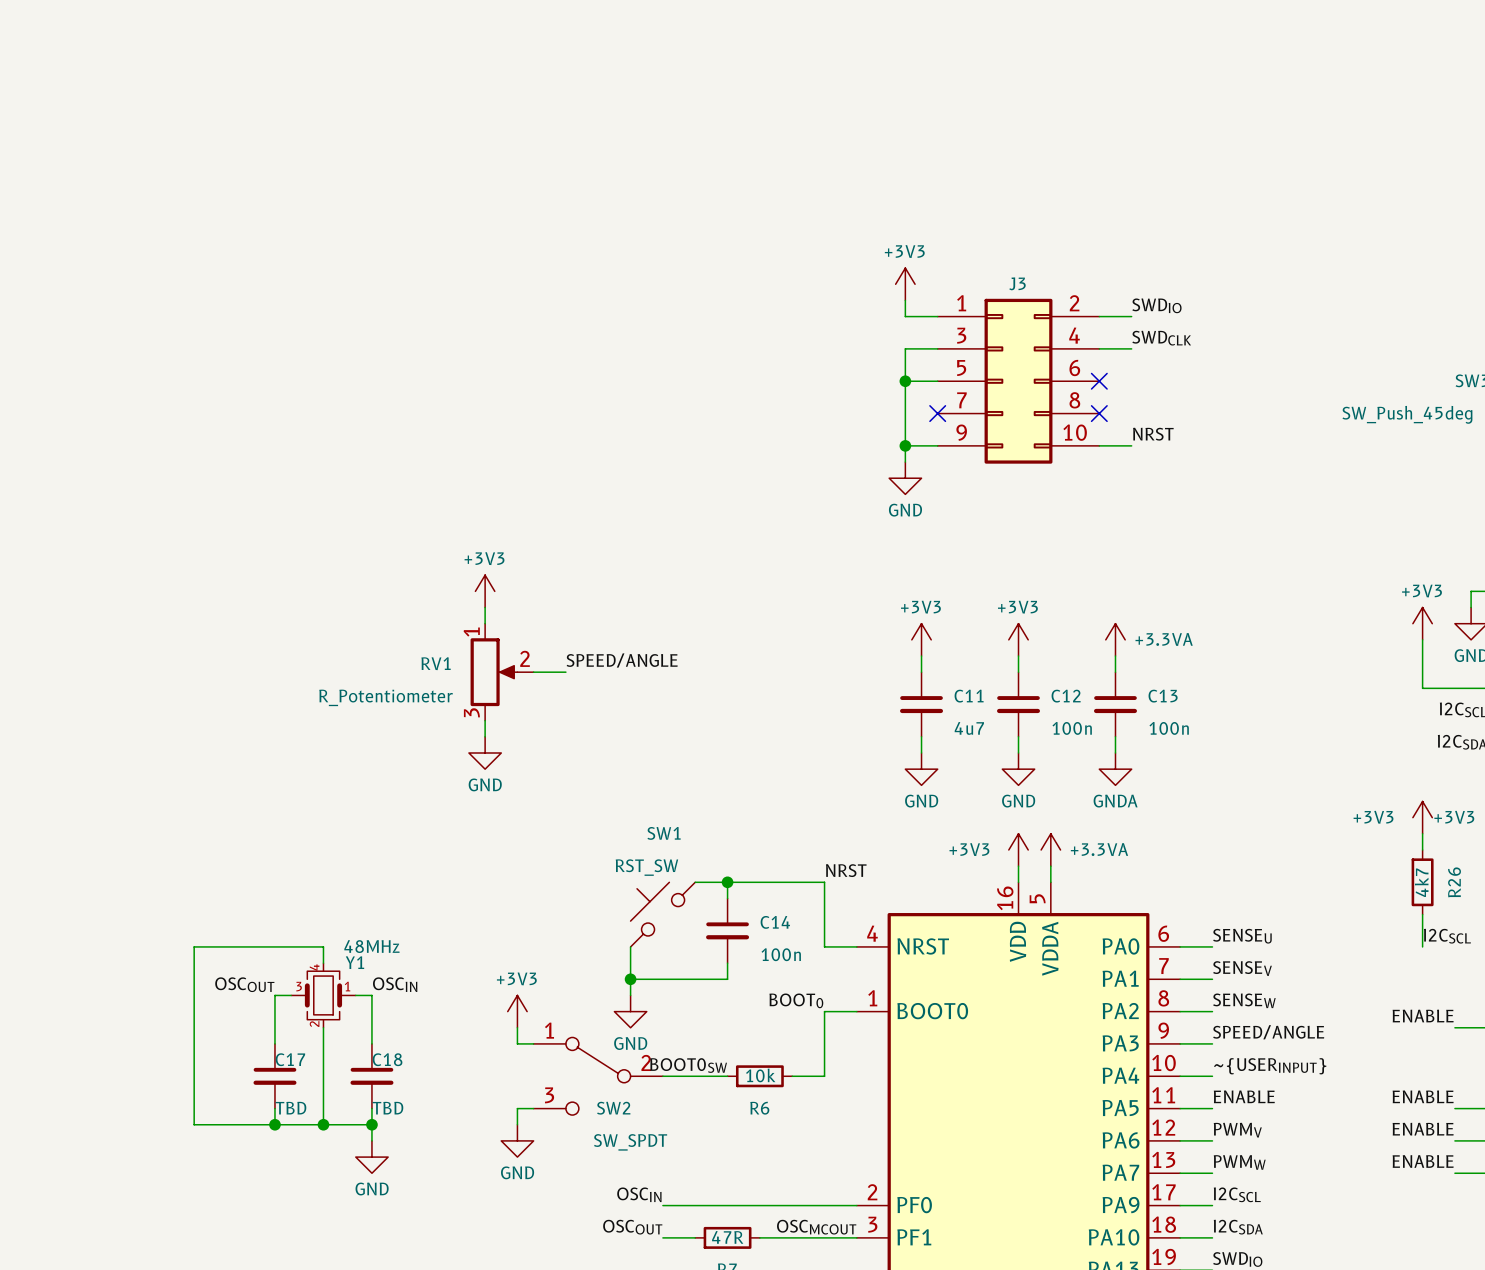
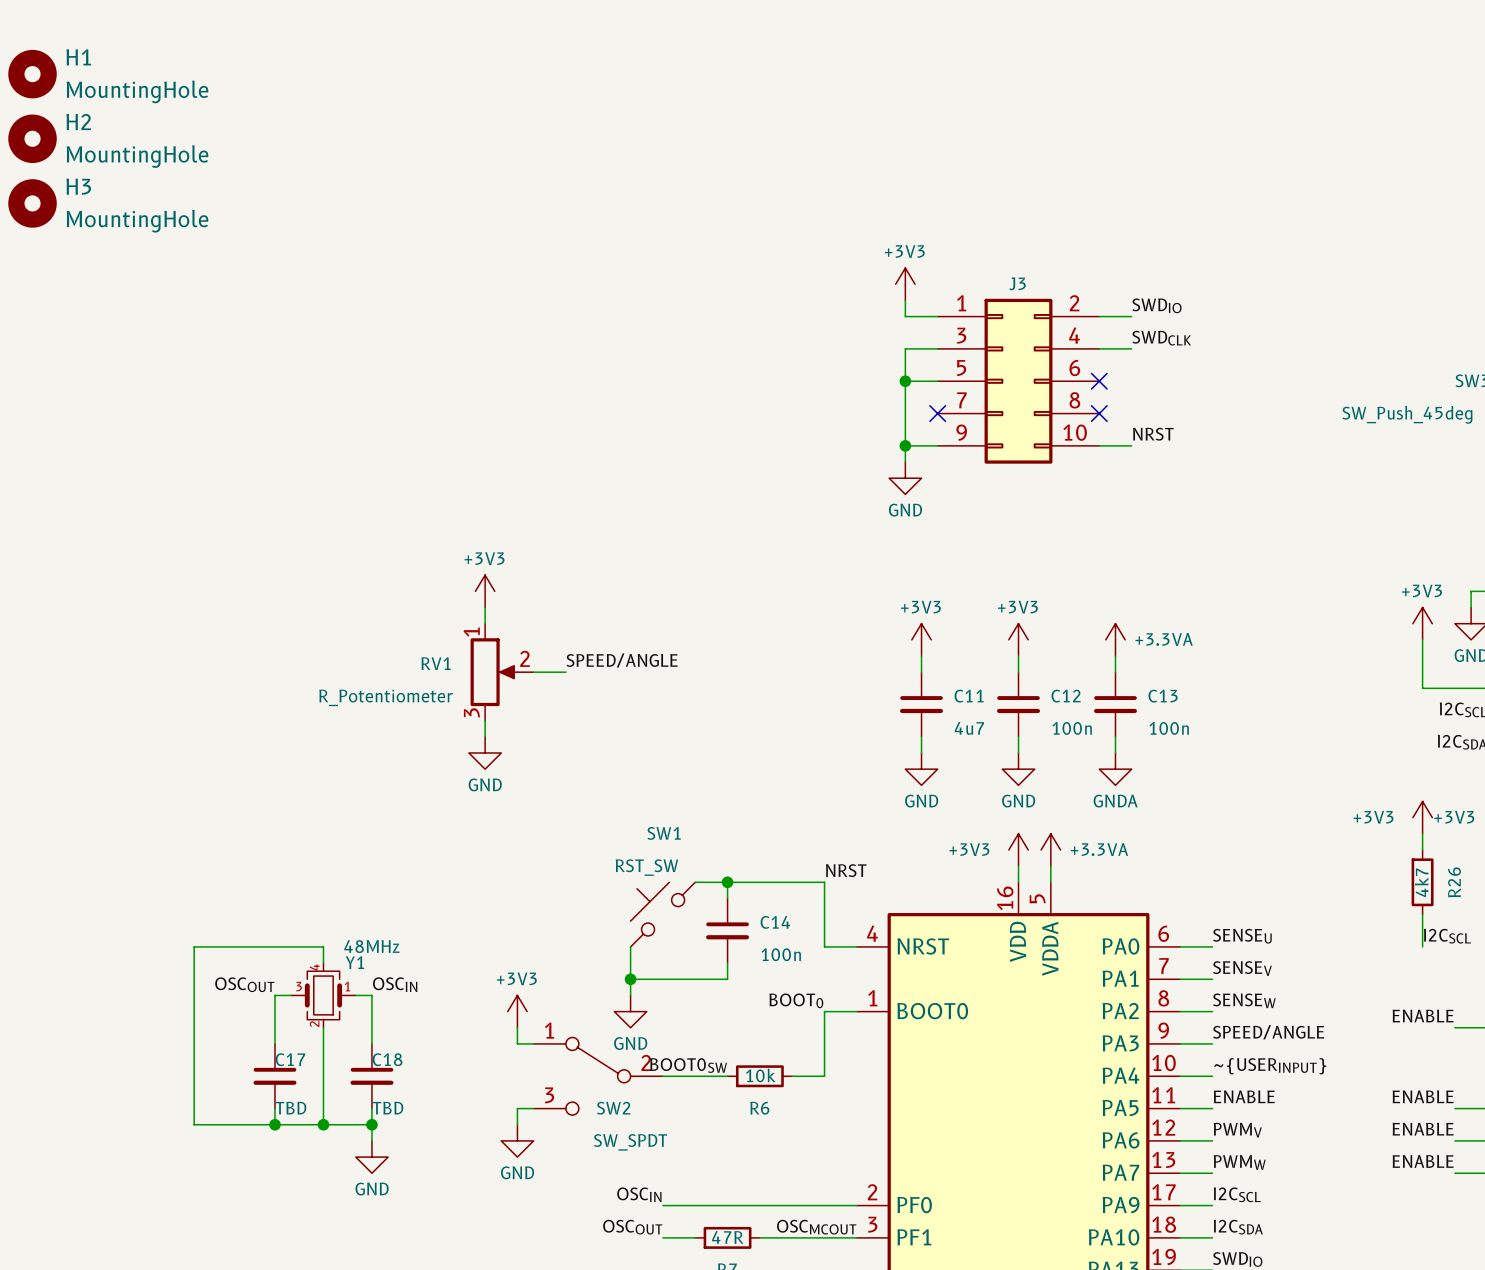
H1: none -> MountingHole (32, 74)
H2: none -> MountingHole (32, 138)
H3: none -> MountingHole (32, 203)

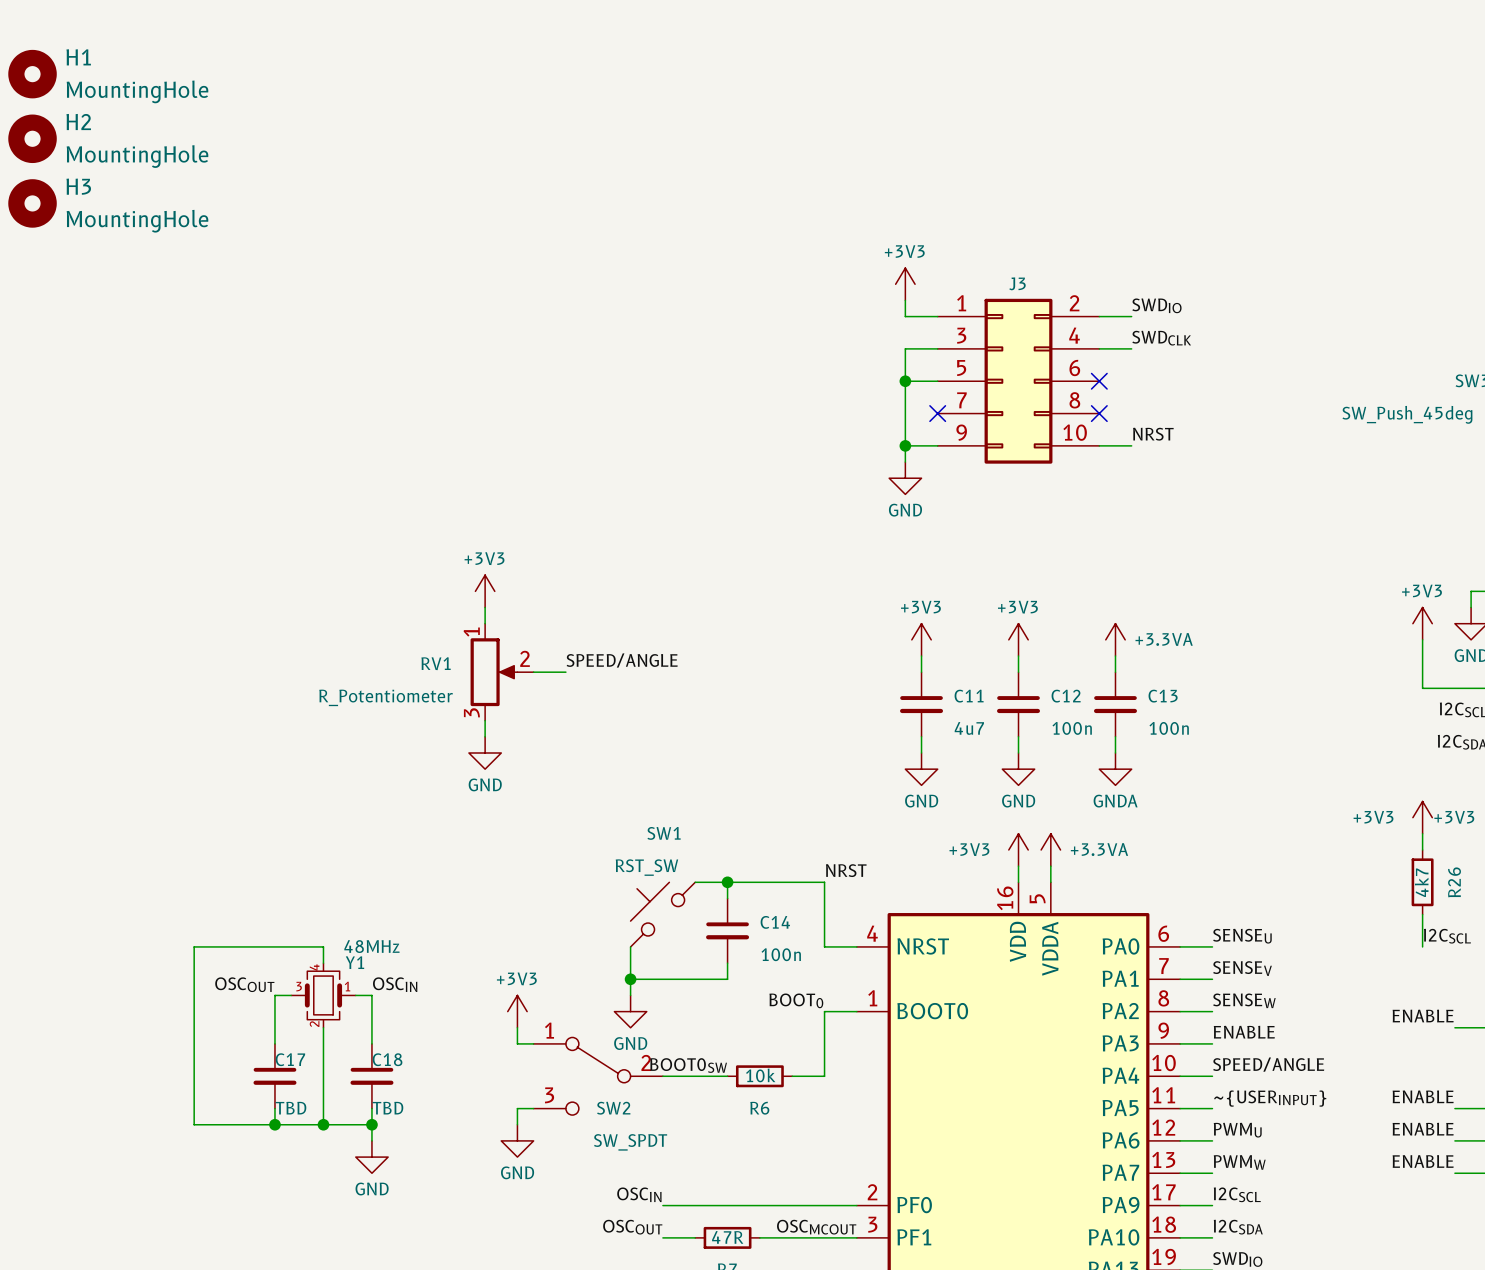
label: SPEED/ANGLE (1268, 1032) -> ENABLE (1244, 1032)
label: ~{USERINPUT} (1270, 1066) -> SPEED/ANGLE (1268, 1064)
label: ENABLE (1244, 1096) -> ~{USERINPUT} (1270, 1098)
label: PWMV (1237, 1130) -> PWMU (1237, 1130)

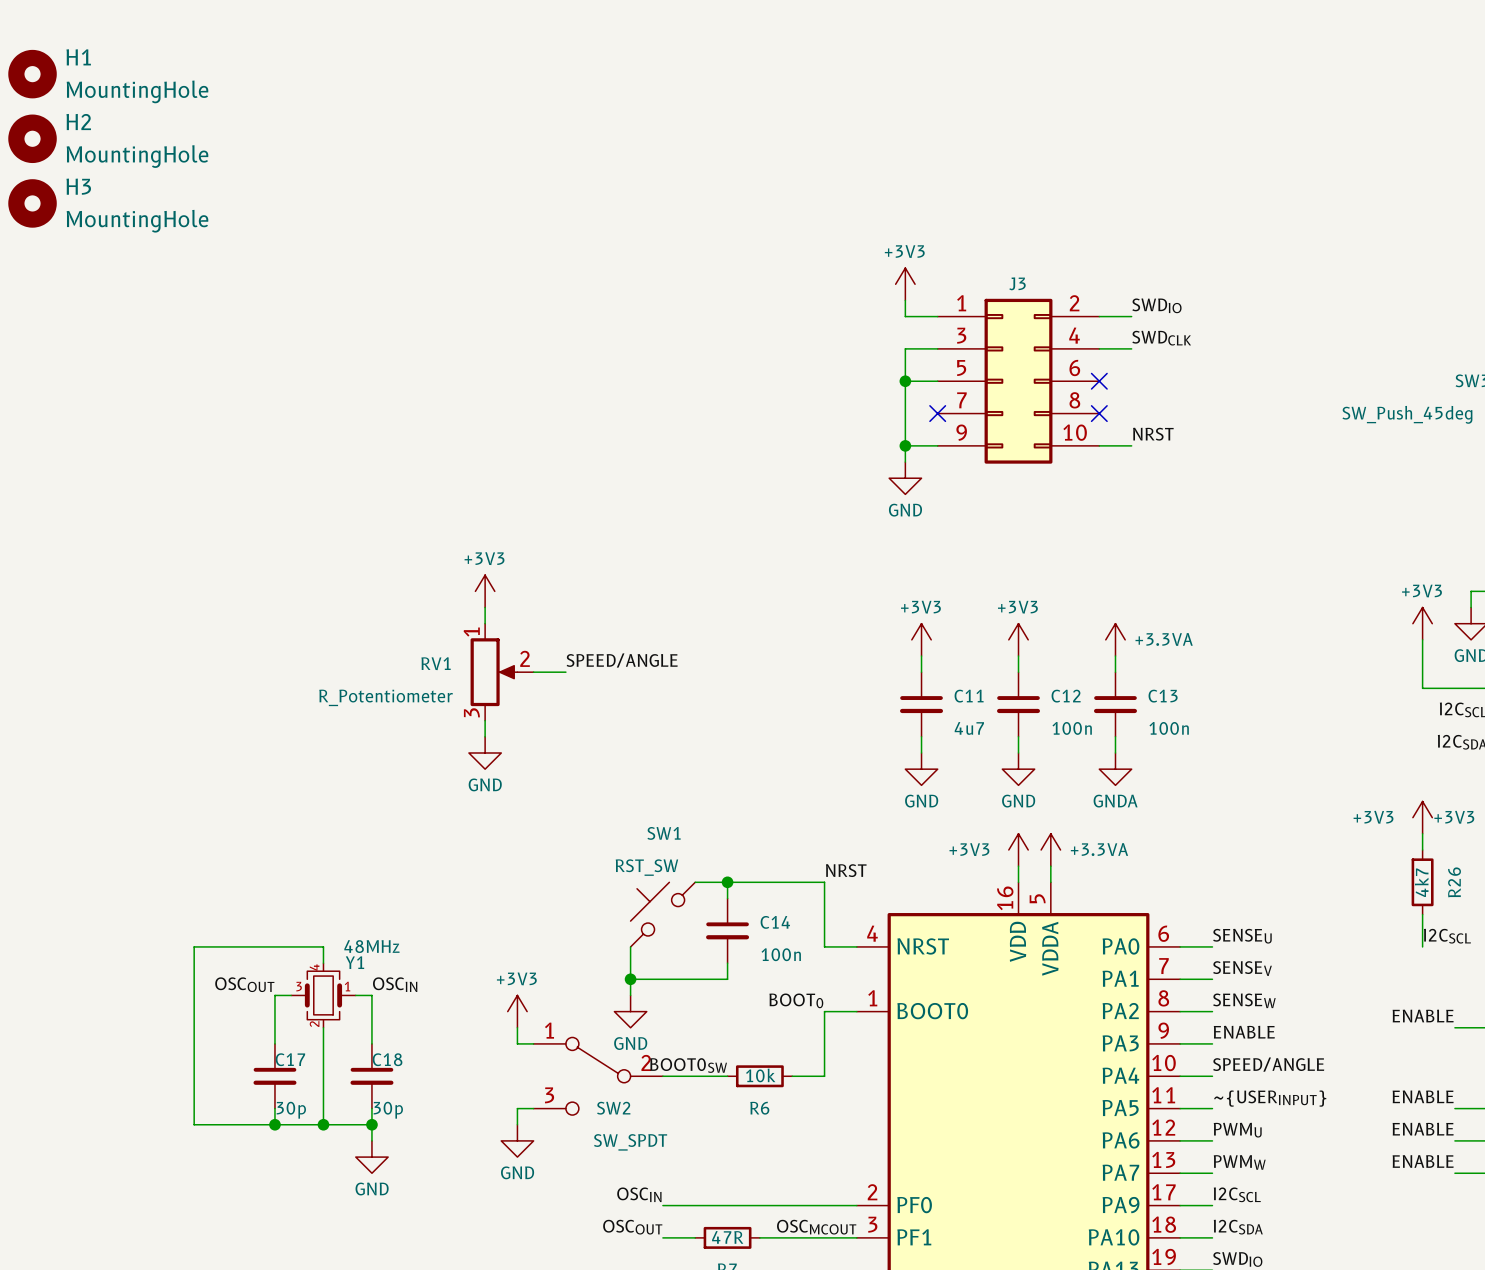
C17 value: TBD (290, 1108) -> 30p (291, 1110)
C18 value: TBD (387, 1108) -> 30p (388, 1110)

